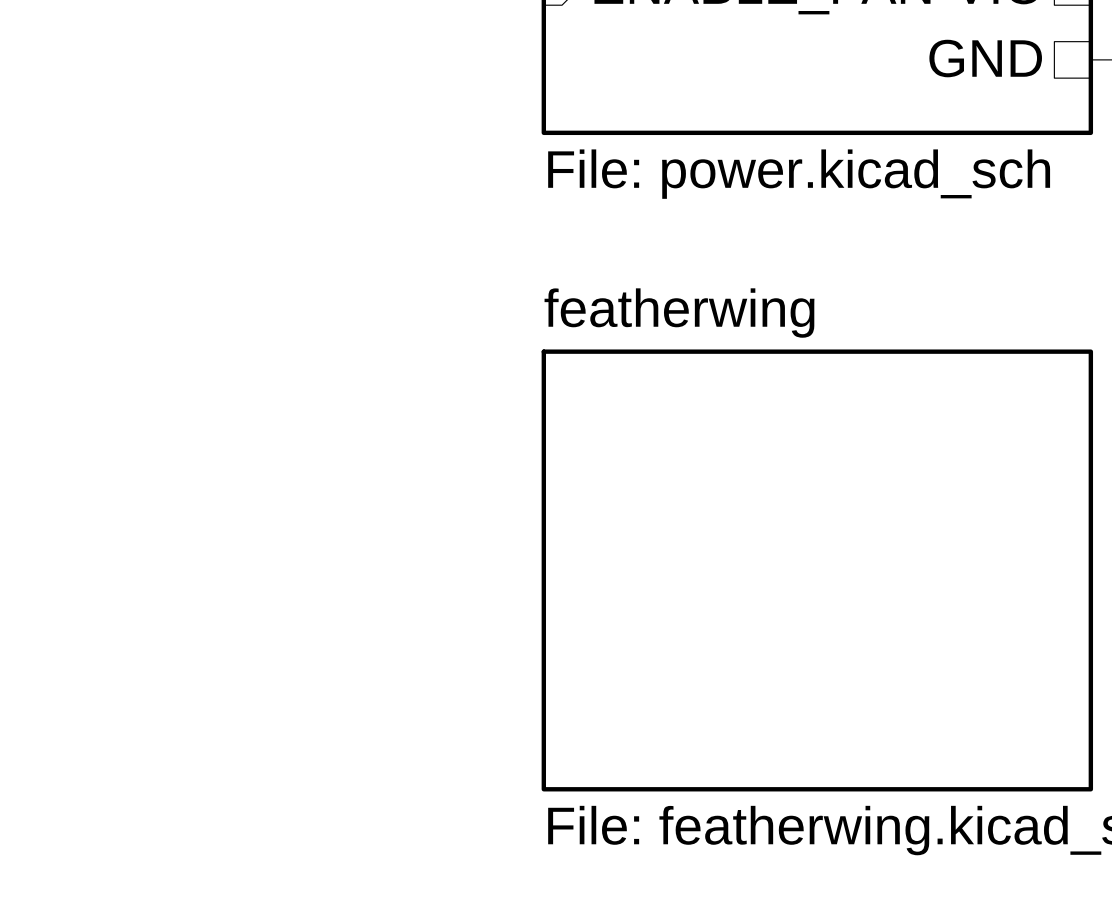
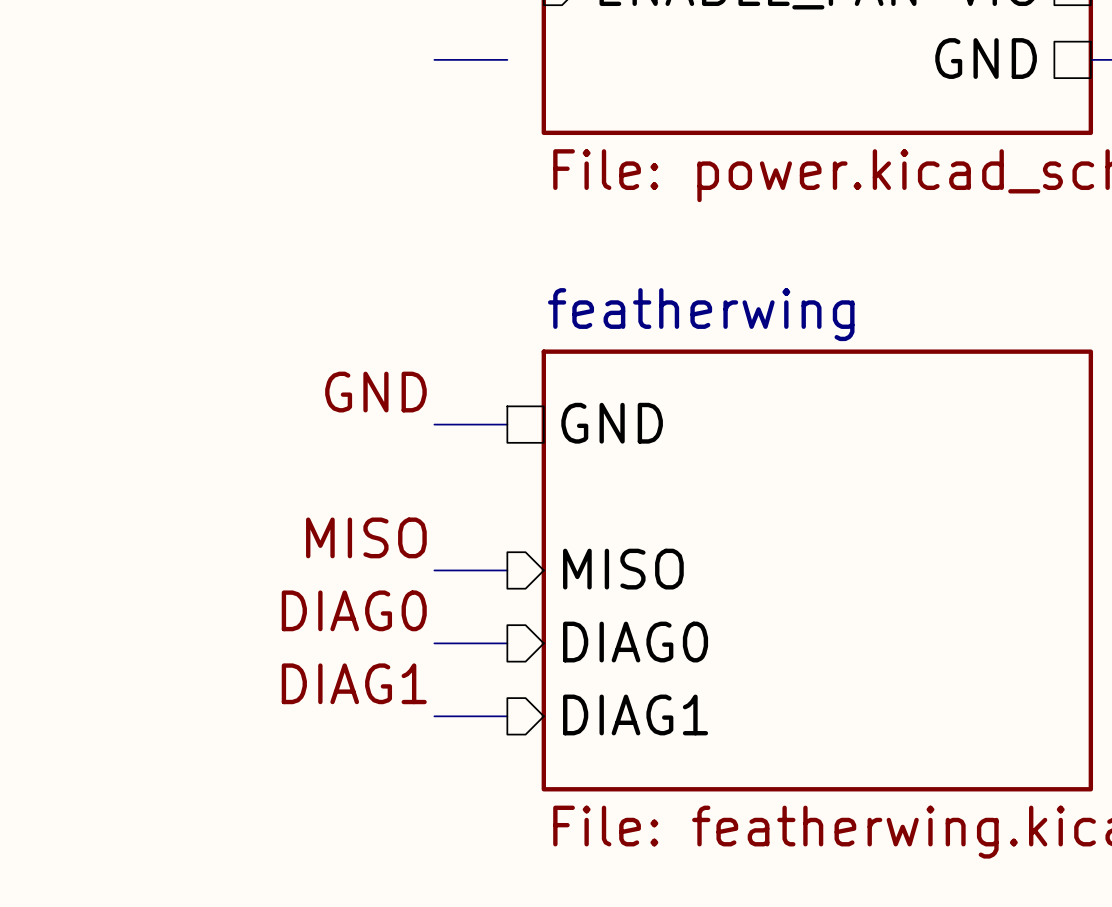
wire: none -> (434, 59) (507, 59)
label: none -> GND (375, 392)
sheet pin: none -> GND (612, 423)
wire: none -> (434, 424) (507, 424)
label: none -> MISO (366, 537)
sheet pin: none -> MISO (623, 569)
wire: none -> (434, 570) (507, 570)
label: none -> DIAG0 (354, 610)
sheet pin: none -> DIAG0 (635, 642)
wire: none -> (434, 643) (507, 643)
label: none -> DIAG1 (354, 683)
sheet pin: none -> DIAG1 (635, 714)
wire: none -> (434, 716) (507, 716)

